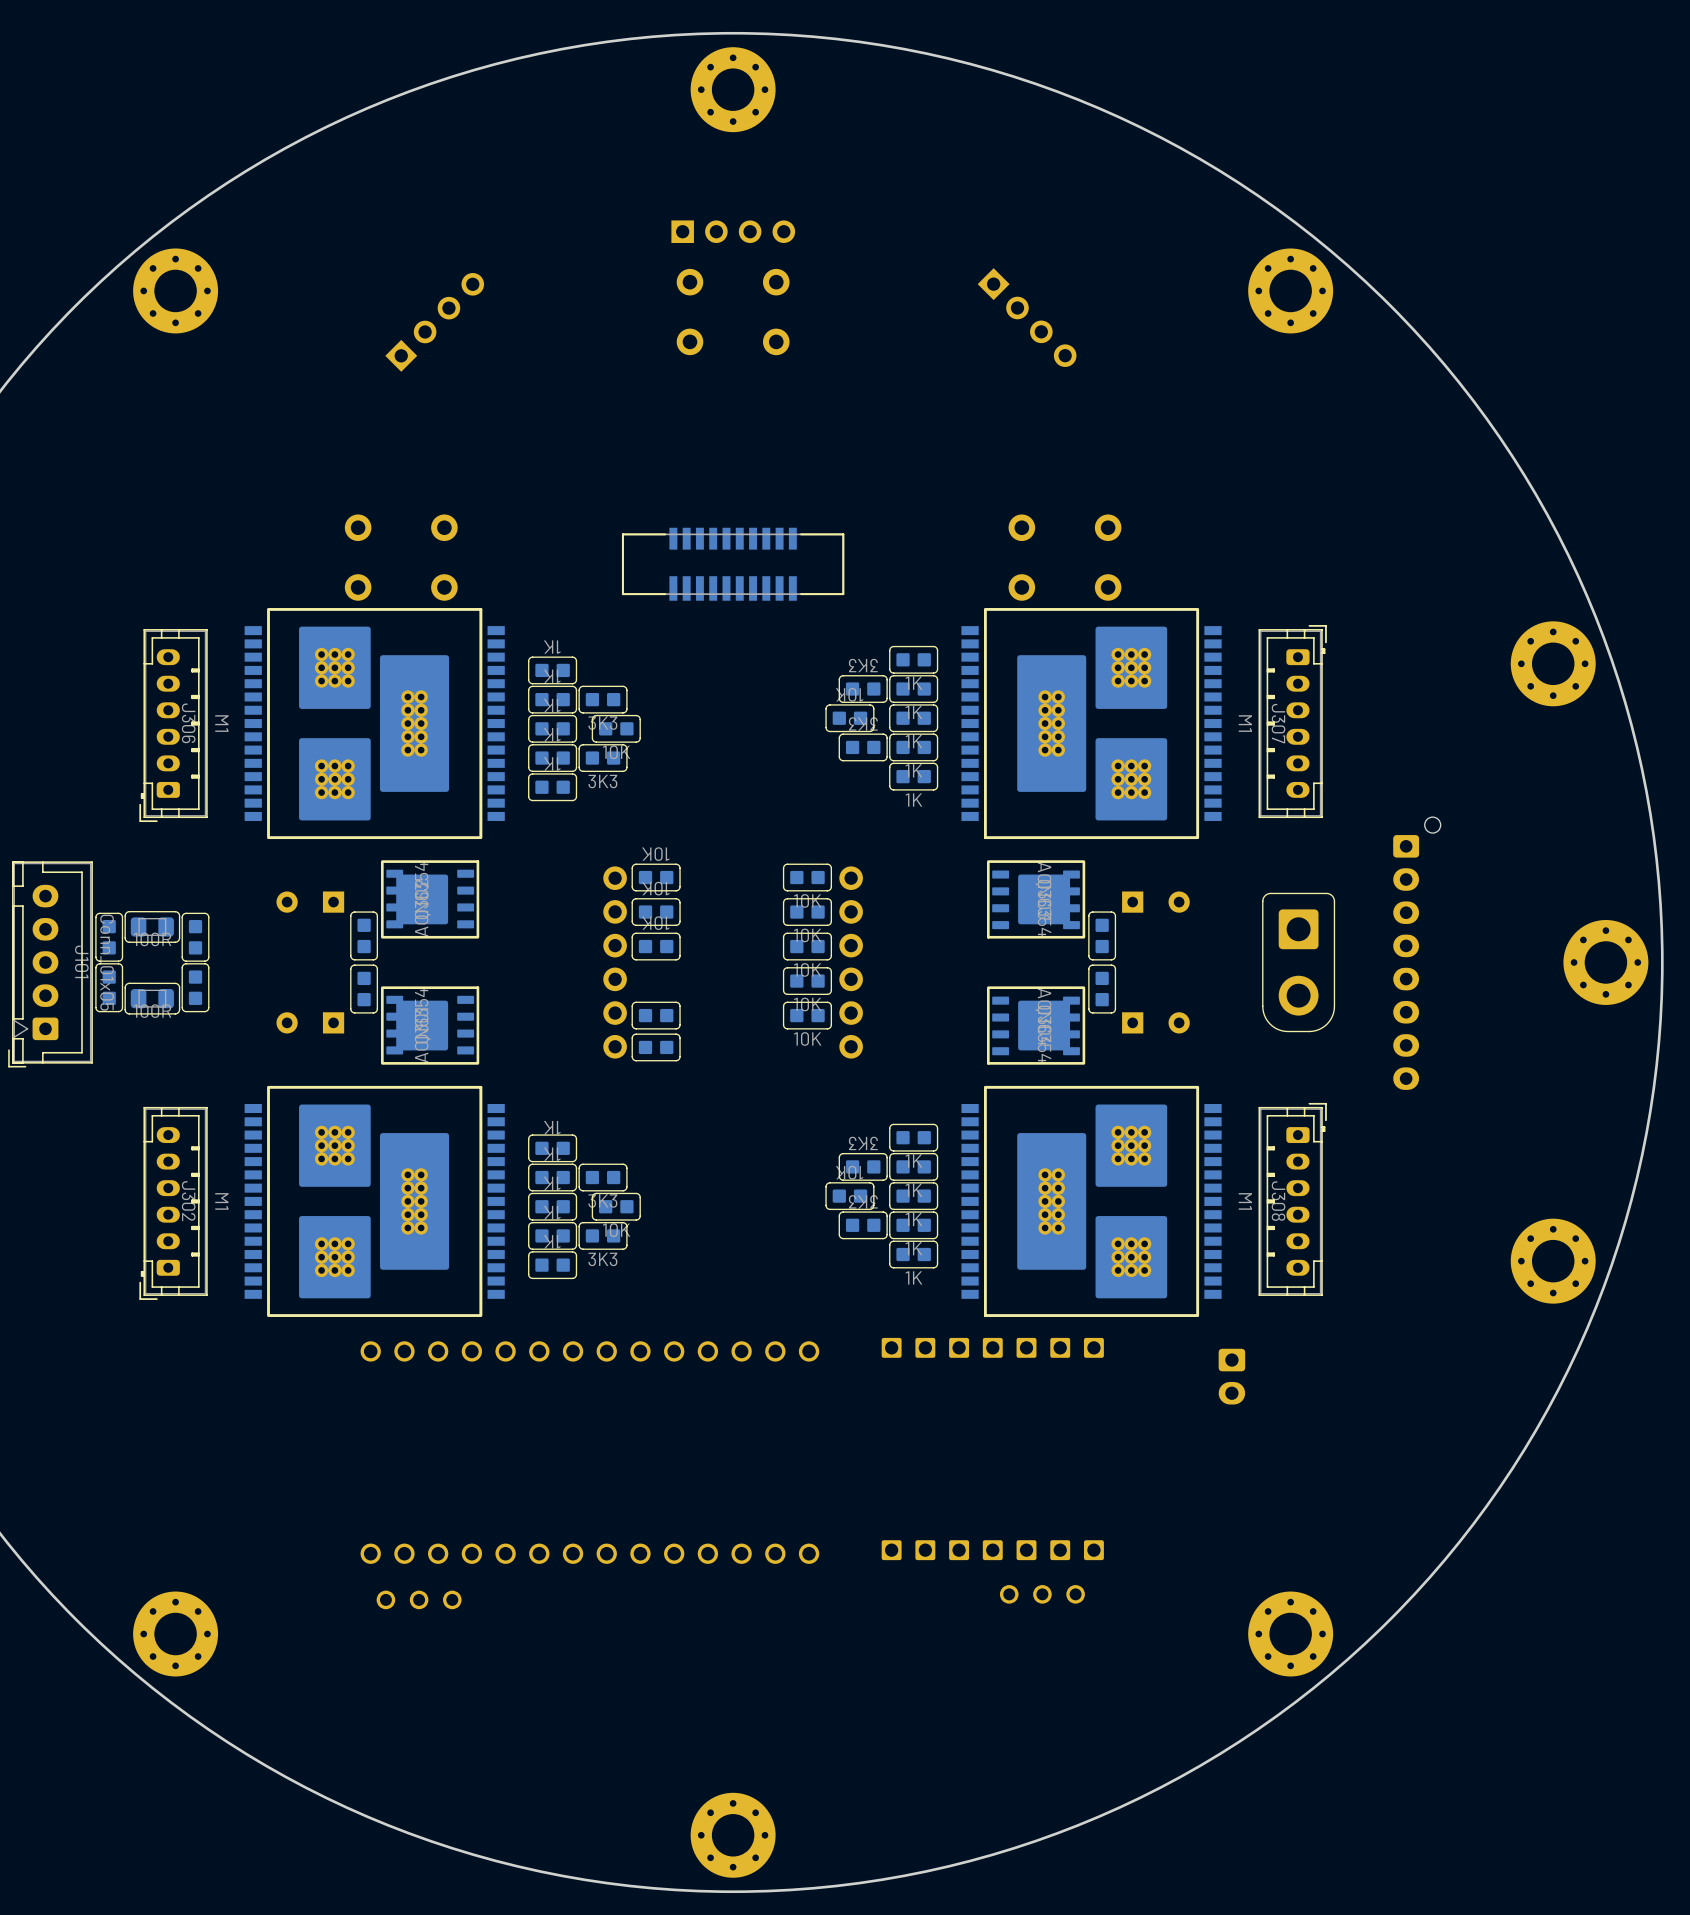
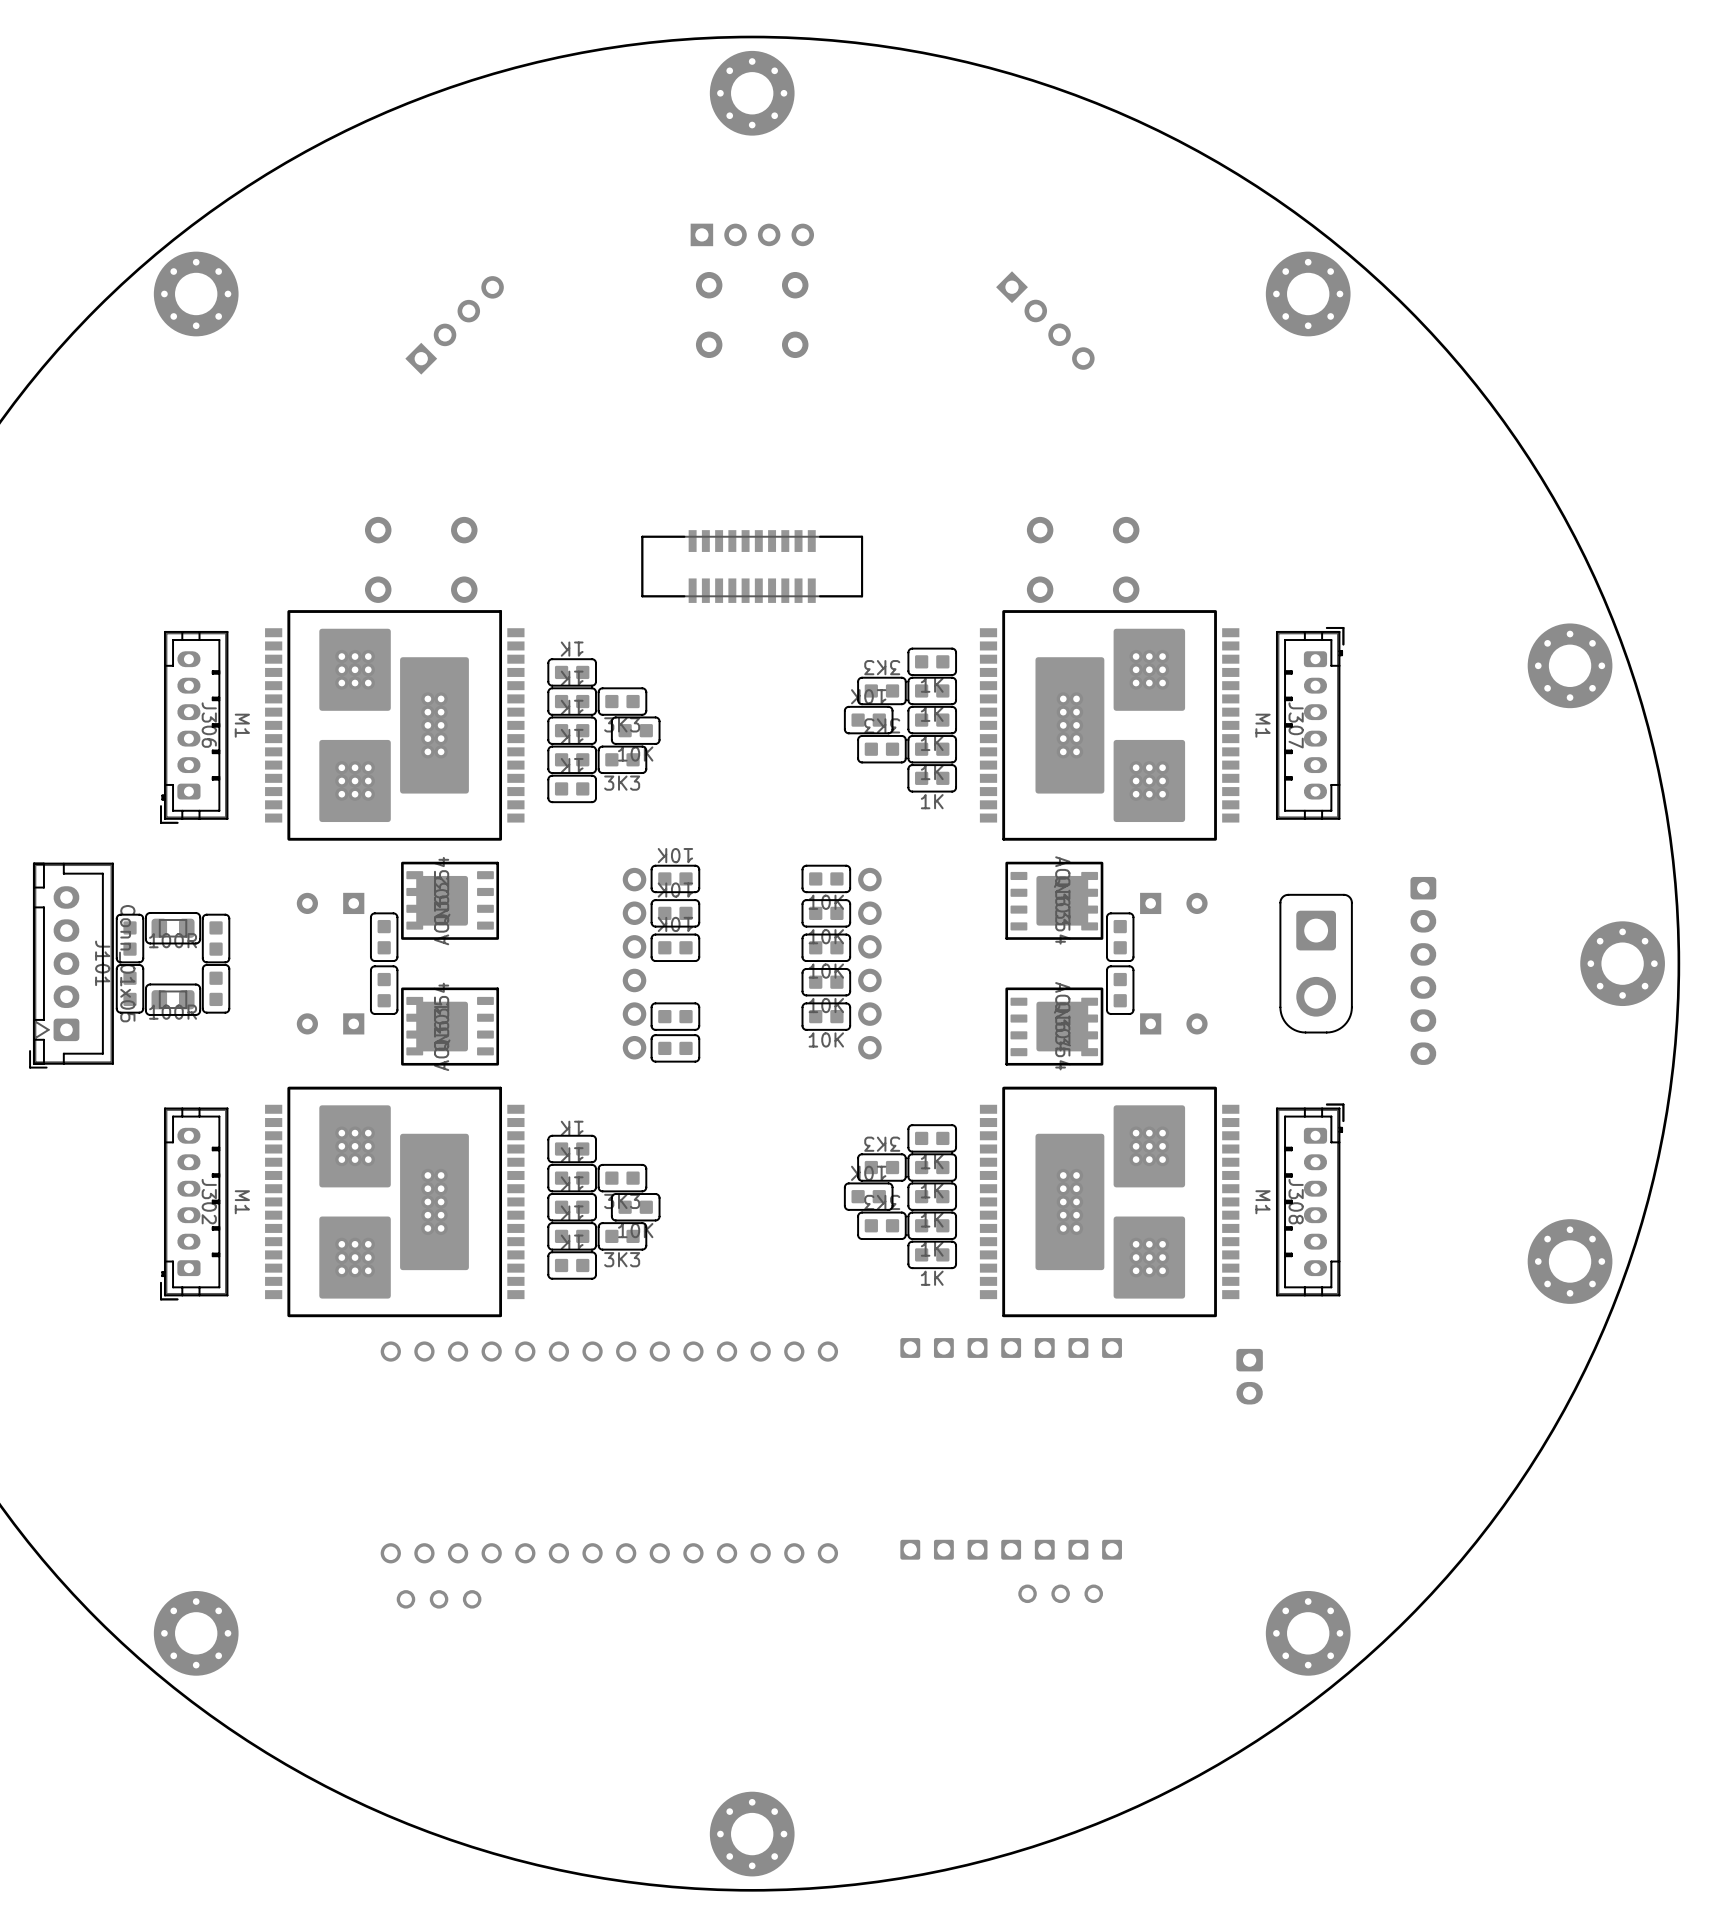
part: (1416, 953) -> none
part: none -> (1423, 970)

